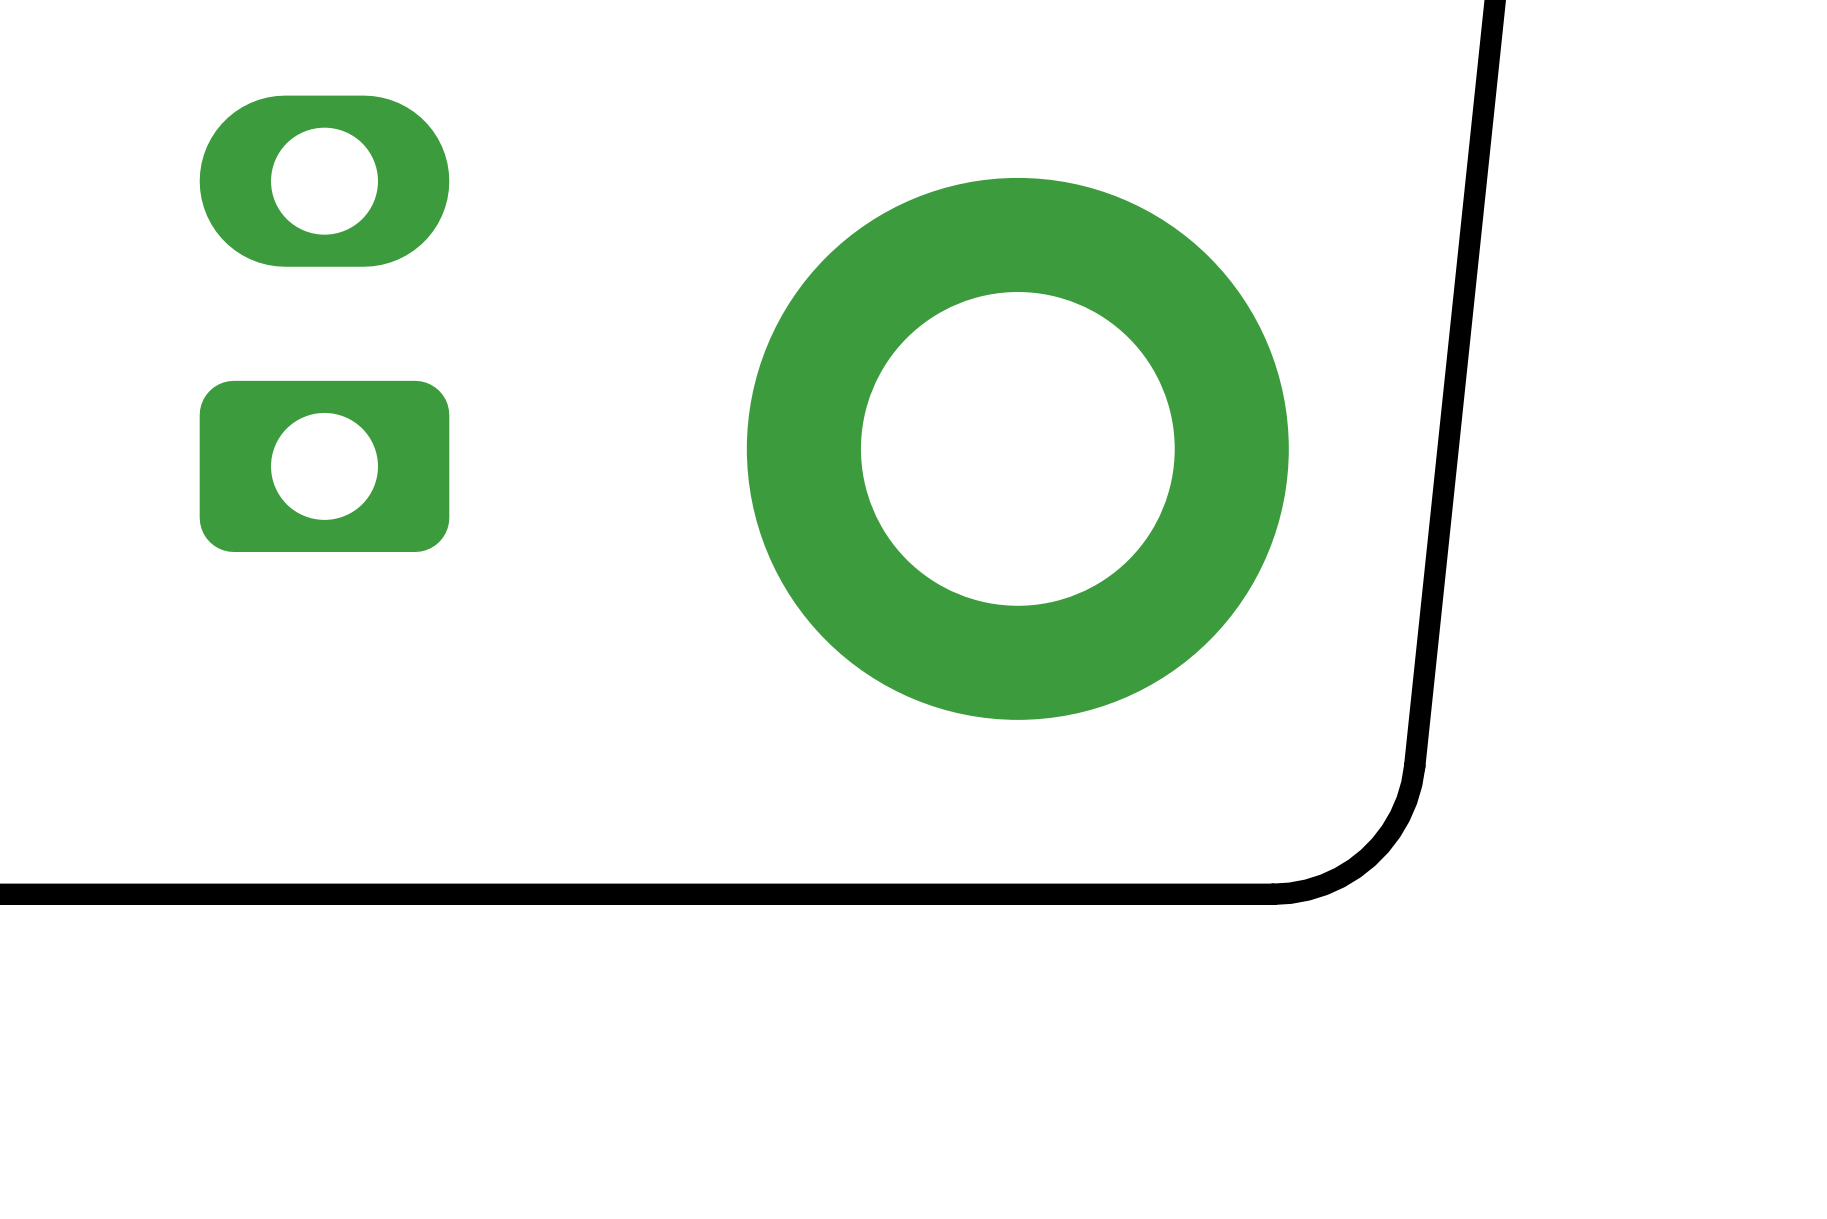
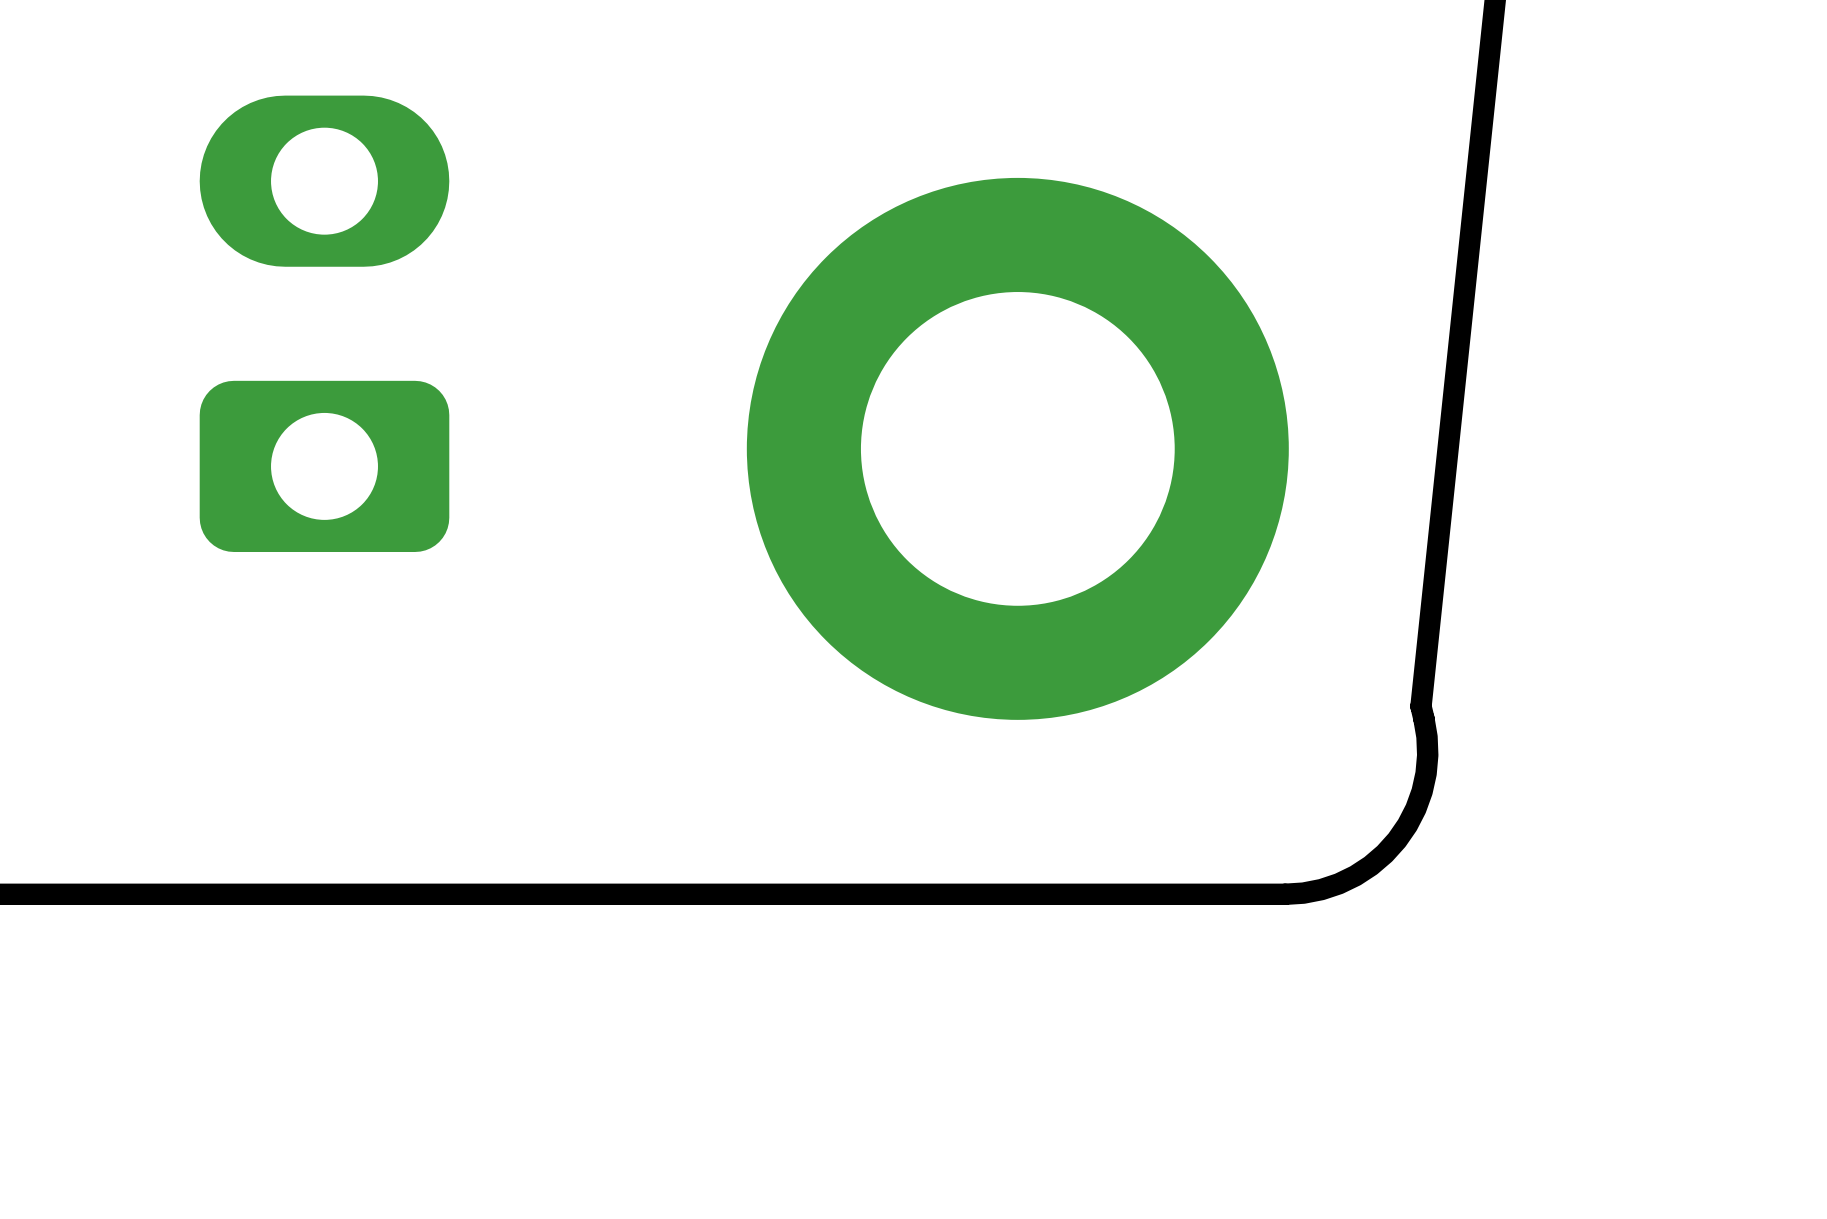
board edge: (1420, 706) (1411, 783) (1399, 816) (1380, 845) (1354, 868) (1323, 884) (1290, 893) (1272, 894) -> (1420, 706) (1427, 736) (1426, 773) (1415, 808) (1397, 840) (1370, 865) (1338, 883) (1303, 893) (1272, 894)

